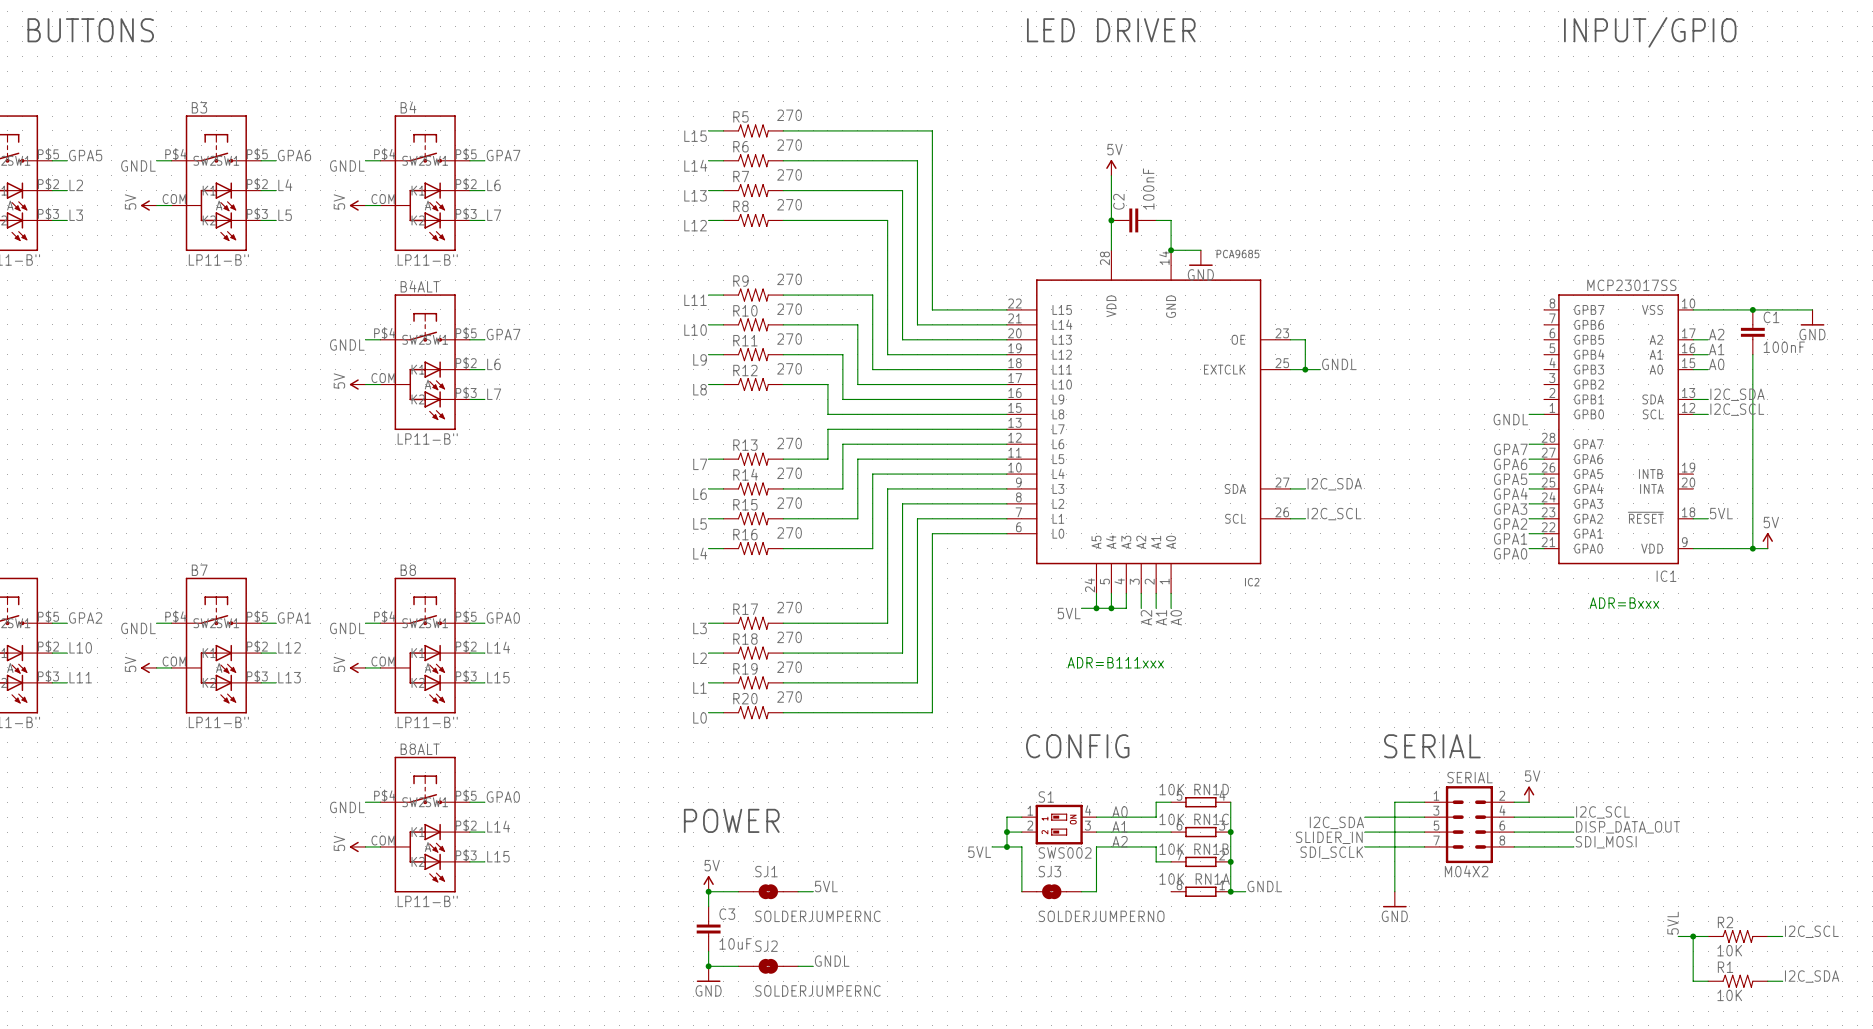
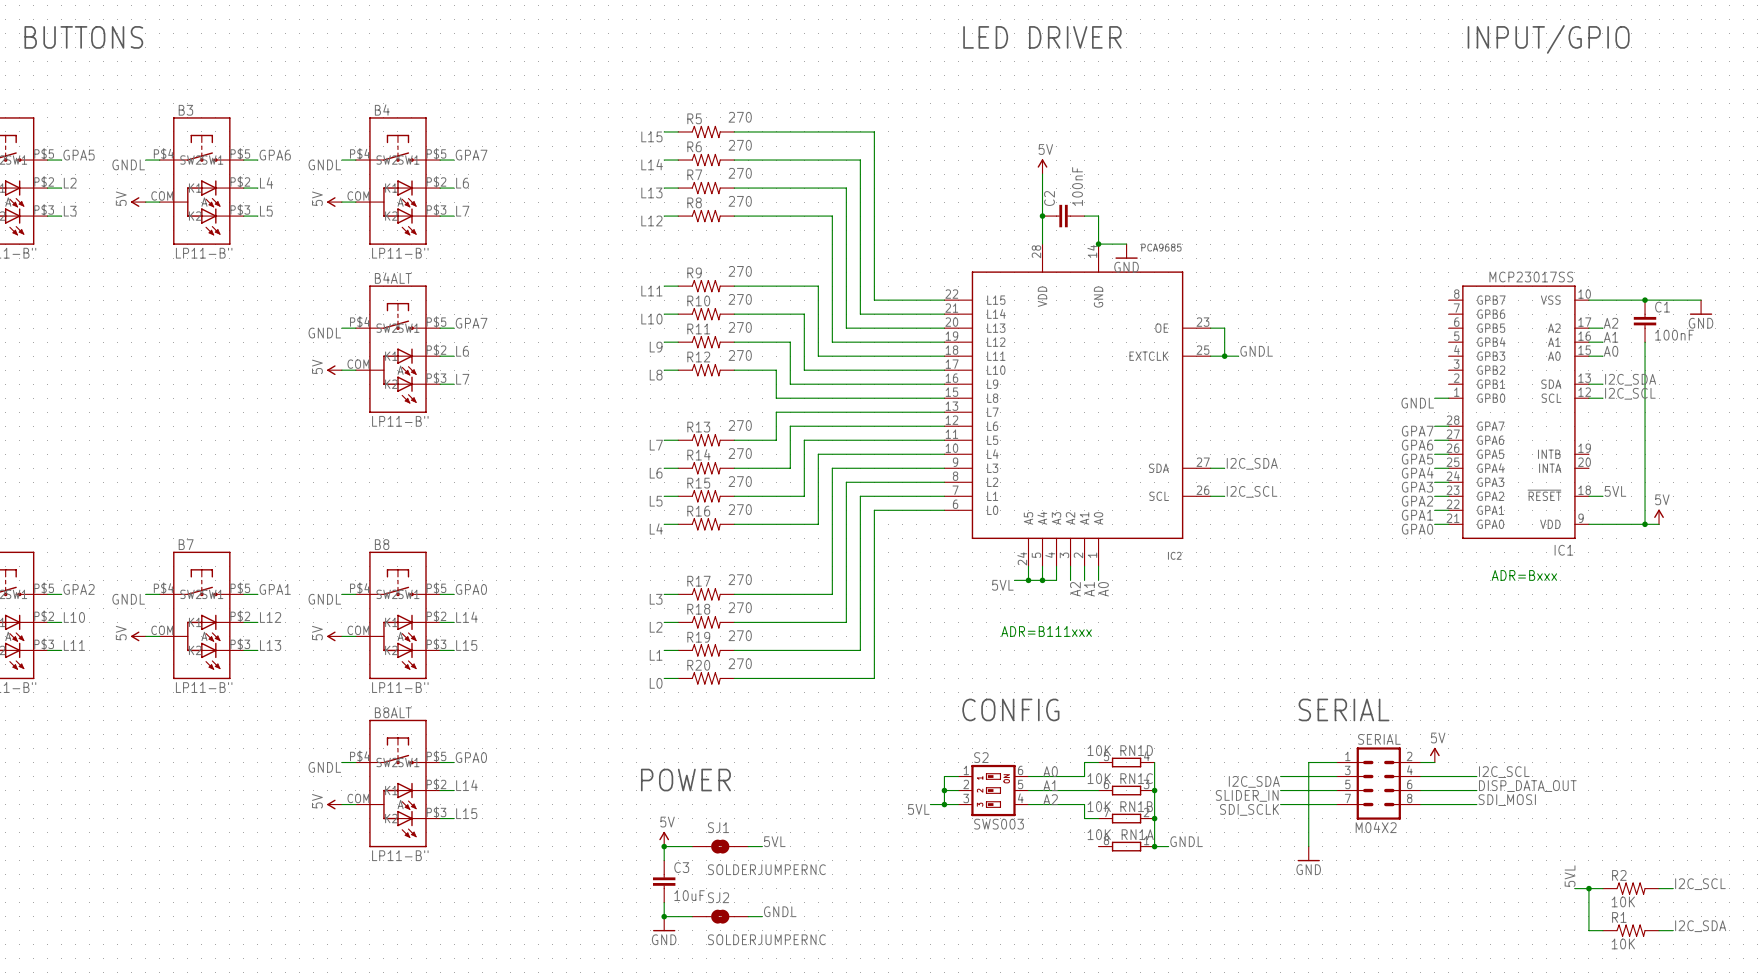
S1: SWS002 (1059, 824) -> none
S2: none -> SWS003 (993, 790)
wire: (1021, 846) (1021, 891) -> none
wire: (1096, 846) (1096, 891) (1081, 891) -> none
SJ3: SOLDERJUMPERNO (1051, 891) -> none

